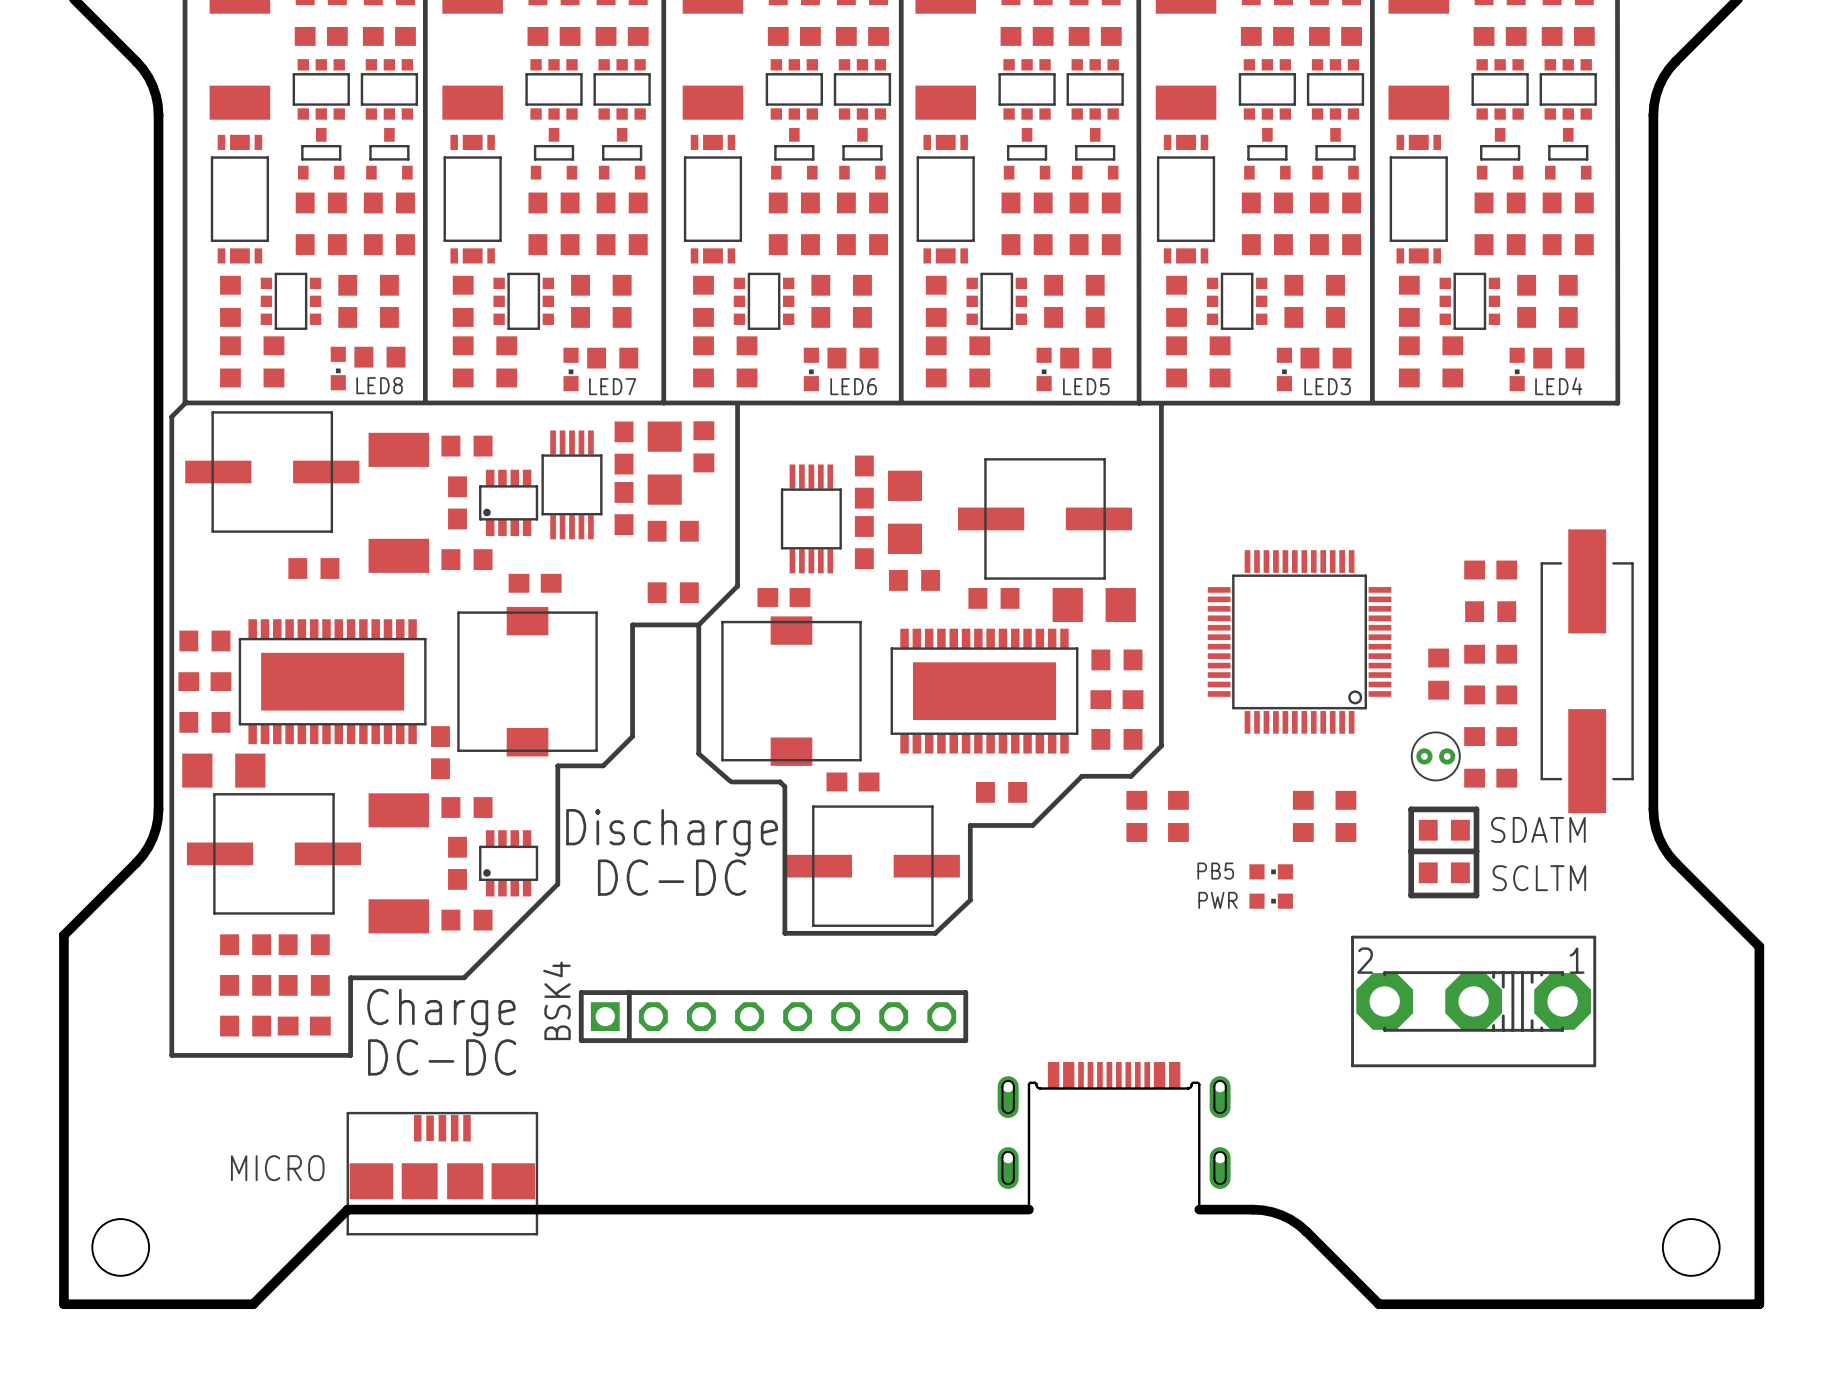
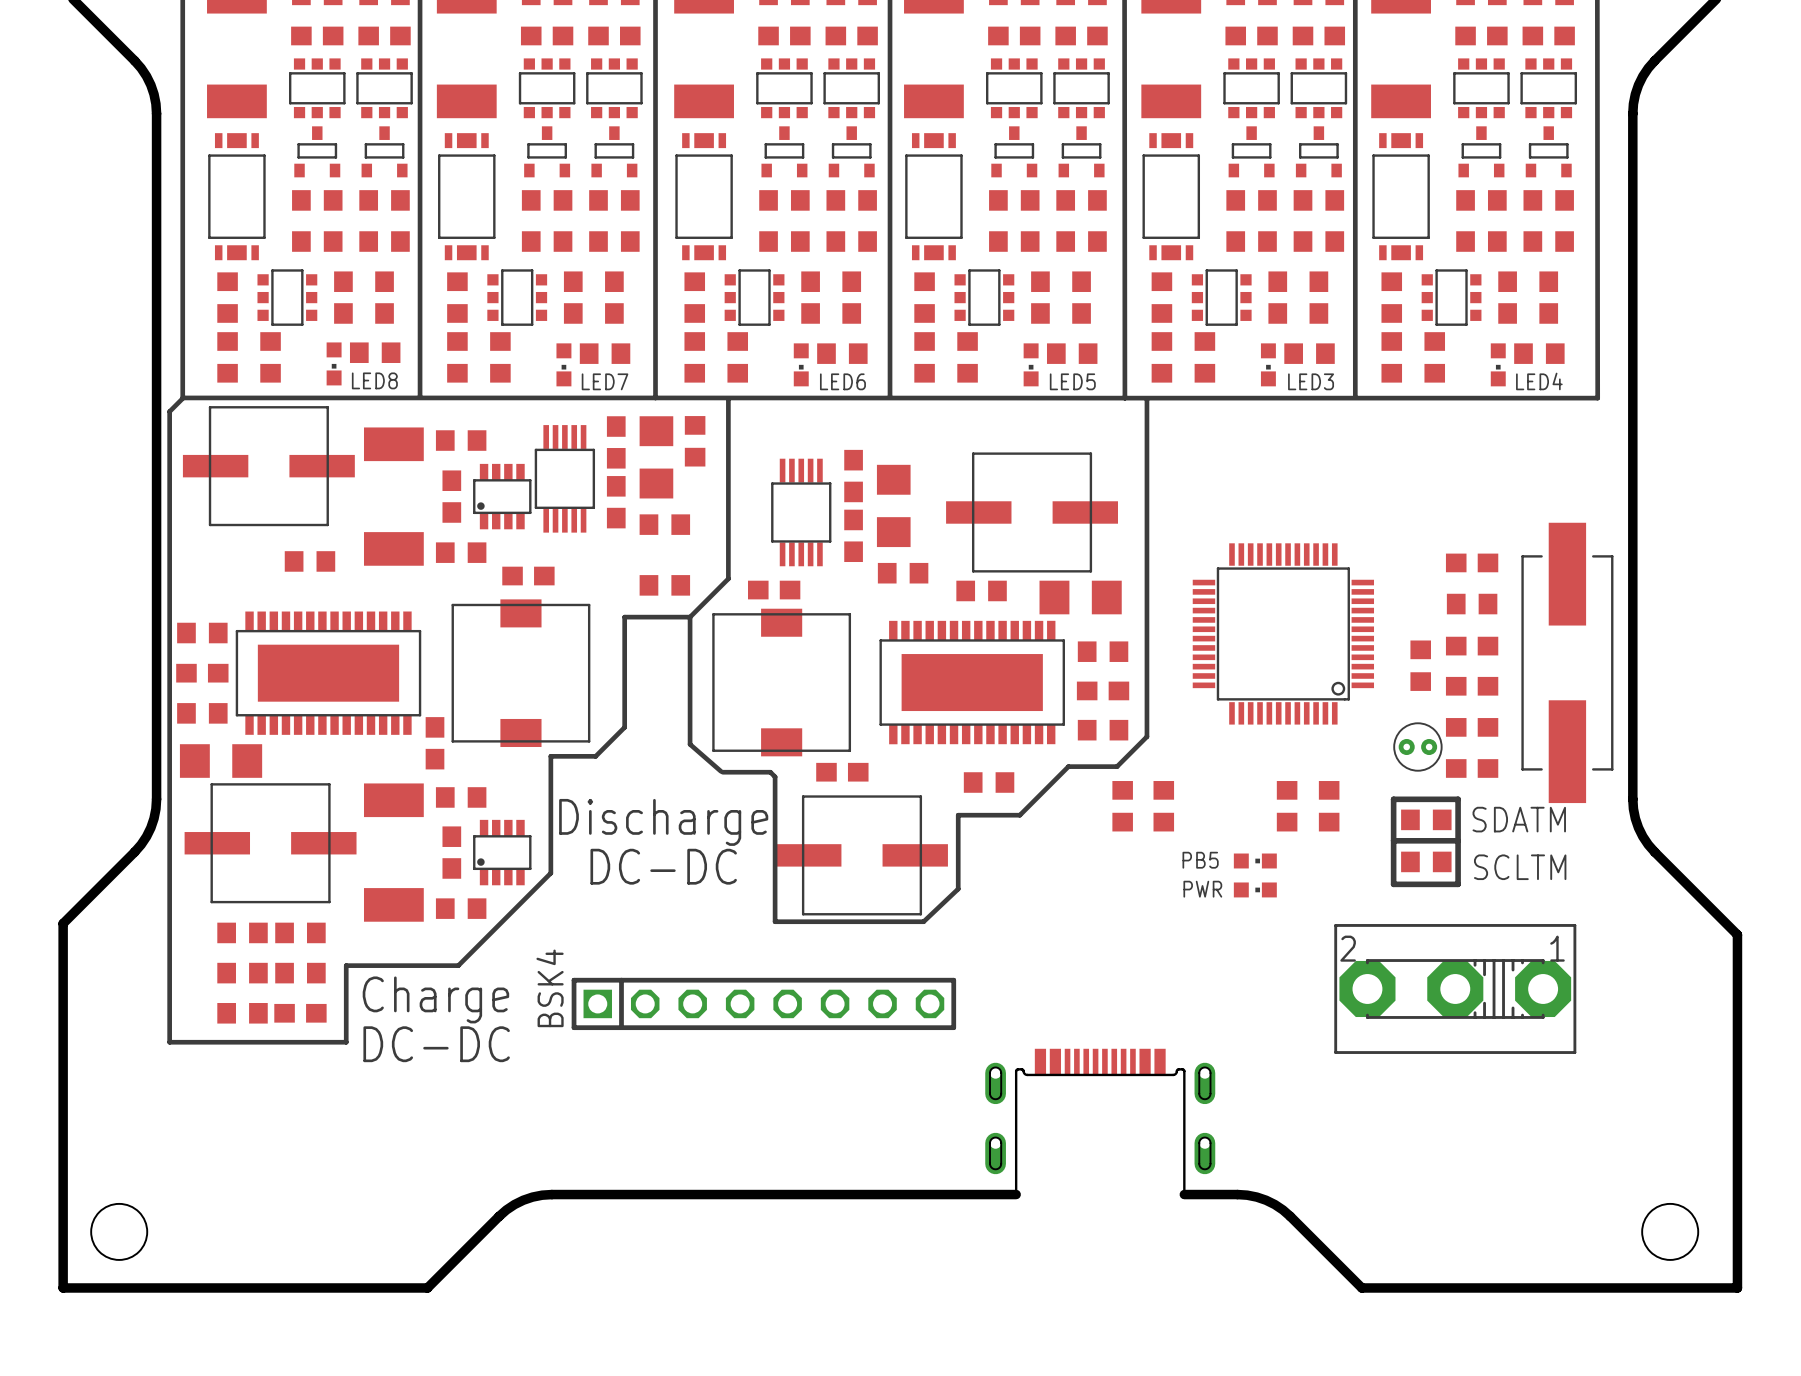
MICRO: (442, 1173) -> none
board edge: (558, 1209) (347, 1209) (253, 1304) -> (551, 1194) (532, 1197) (506, 1209) (427, 1287) (250, 1287)

